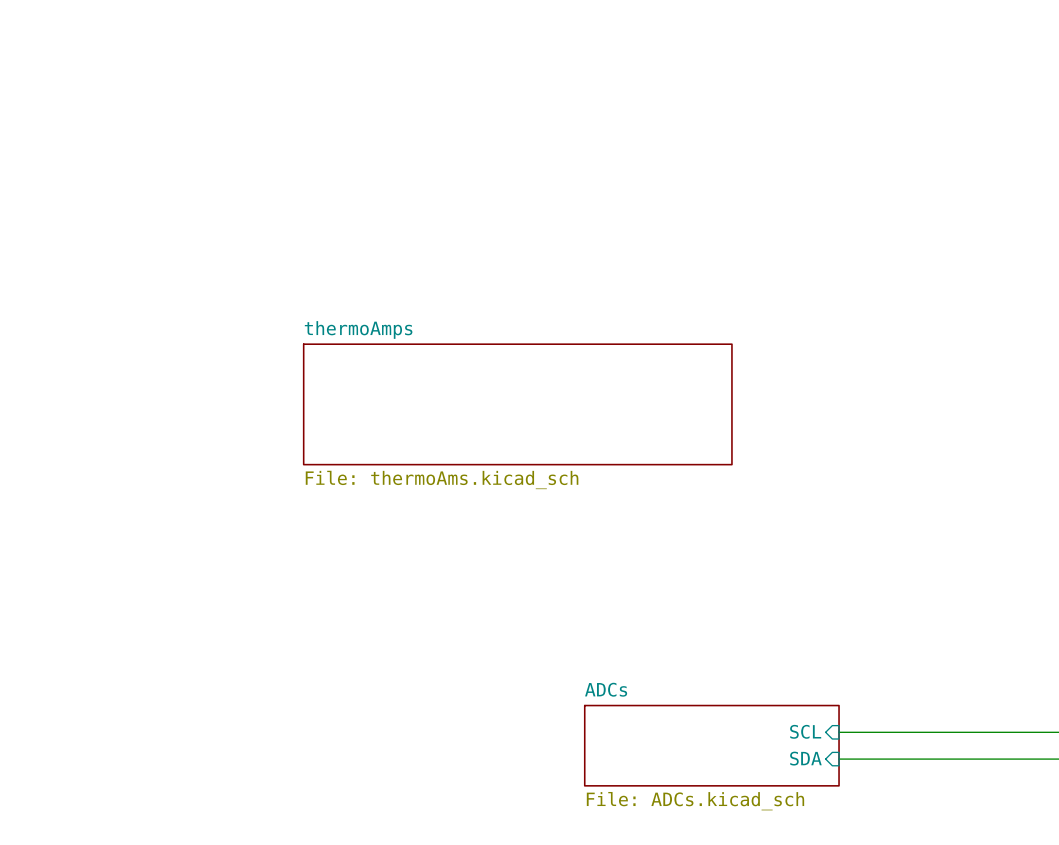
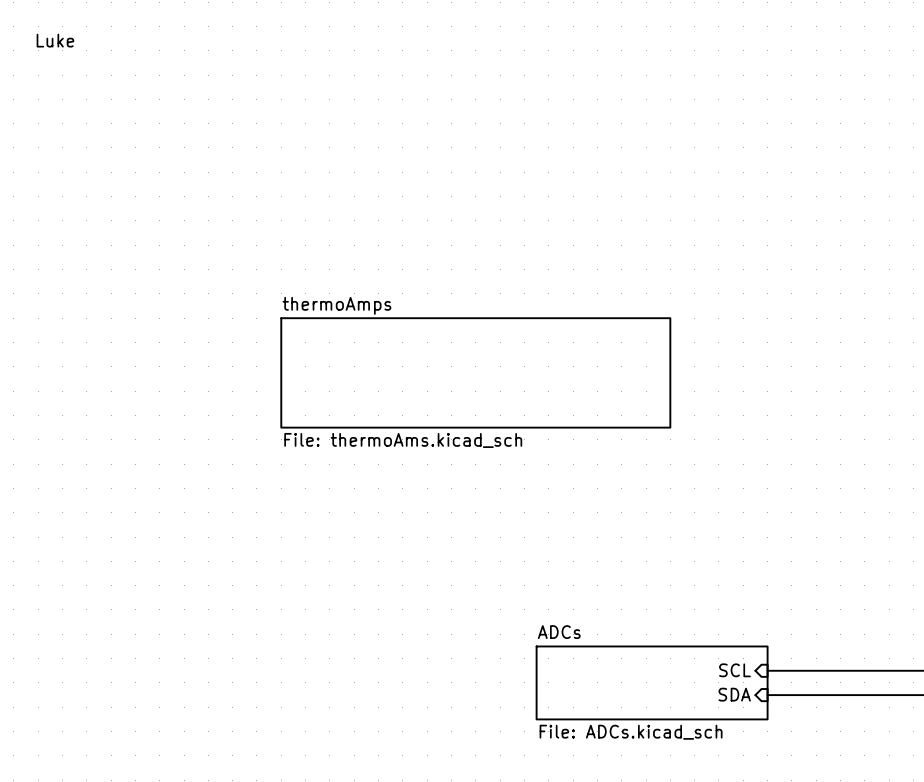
text: none -> Luke (55, 40)

